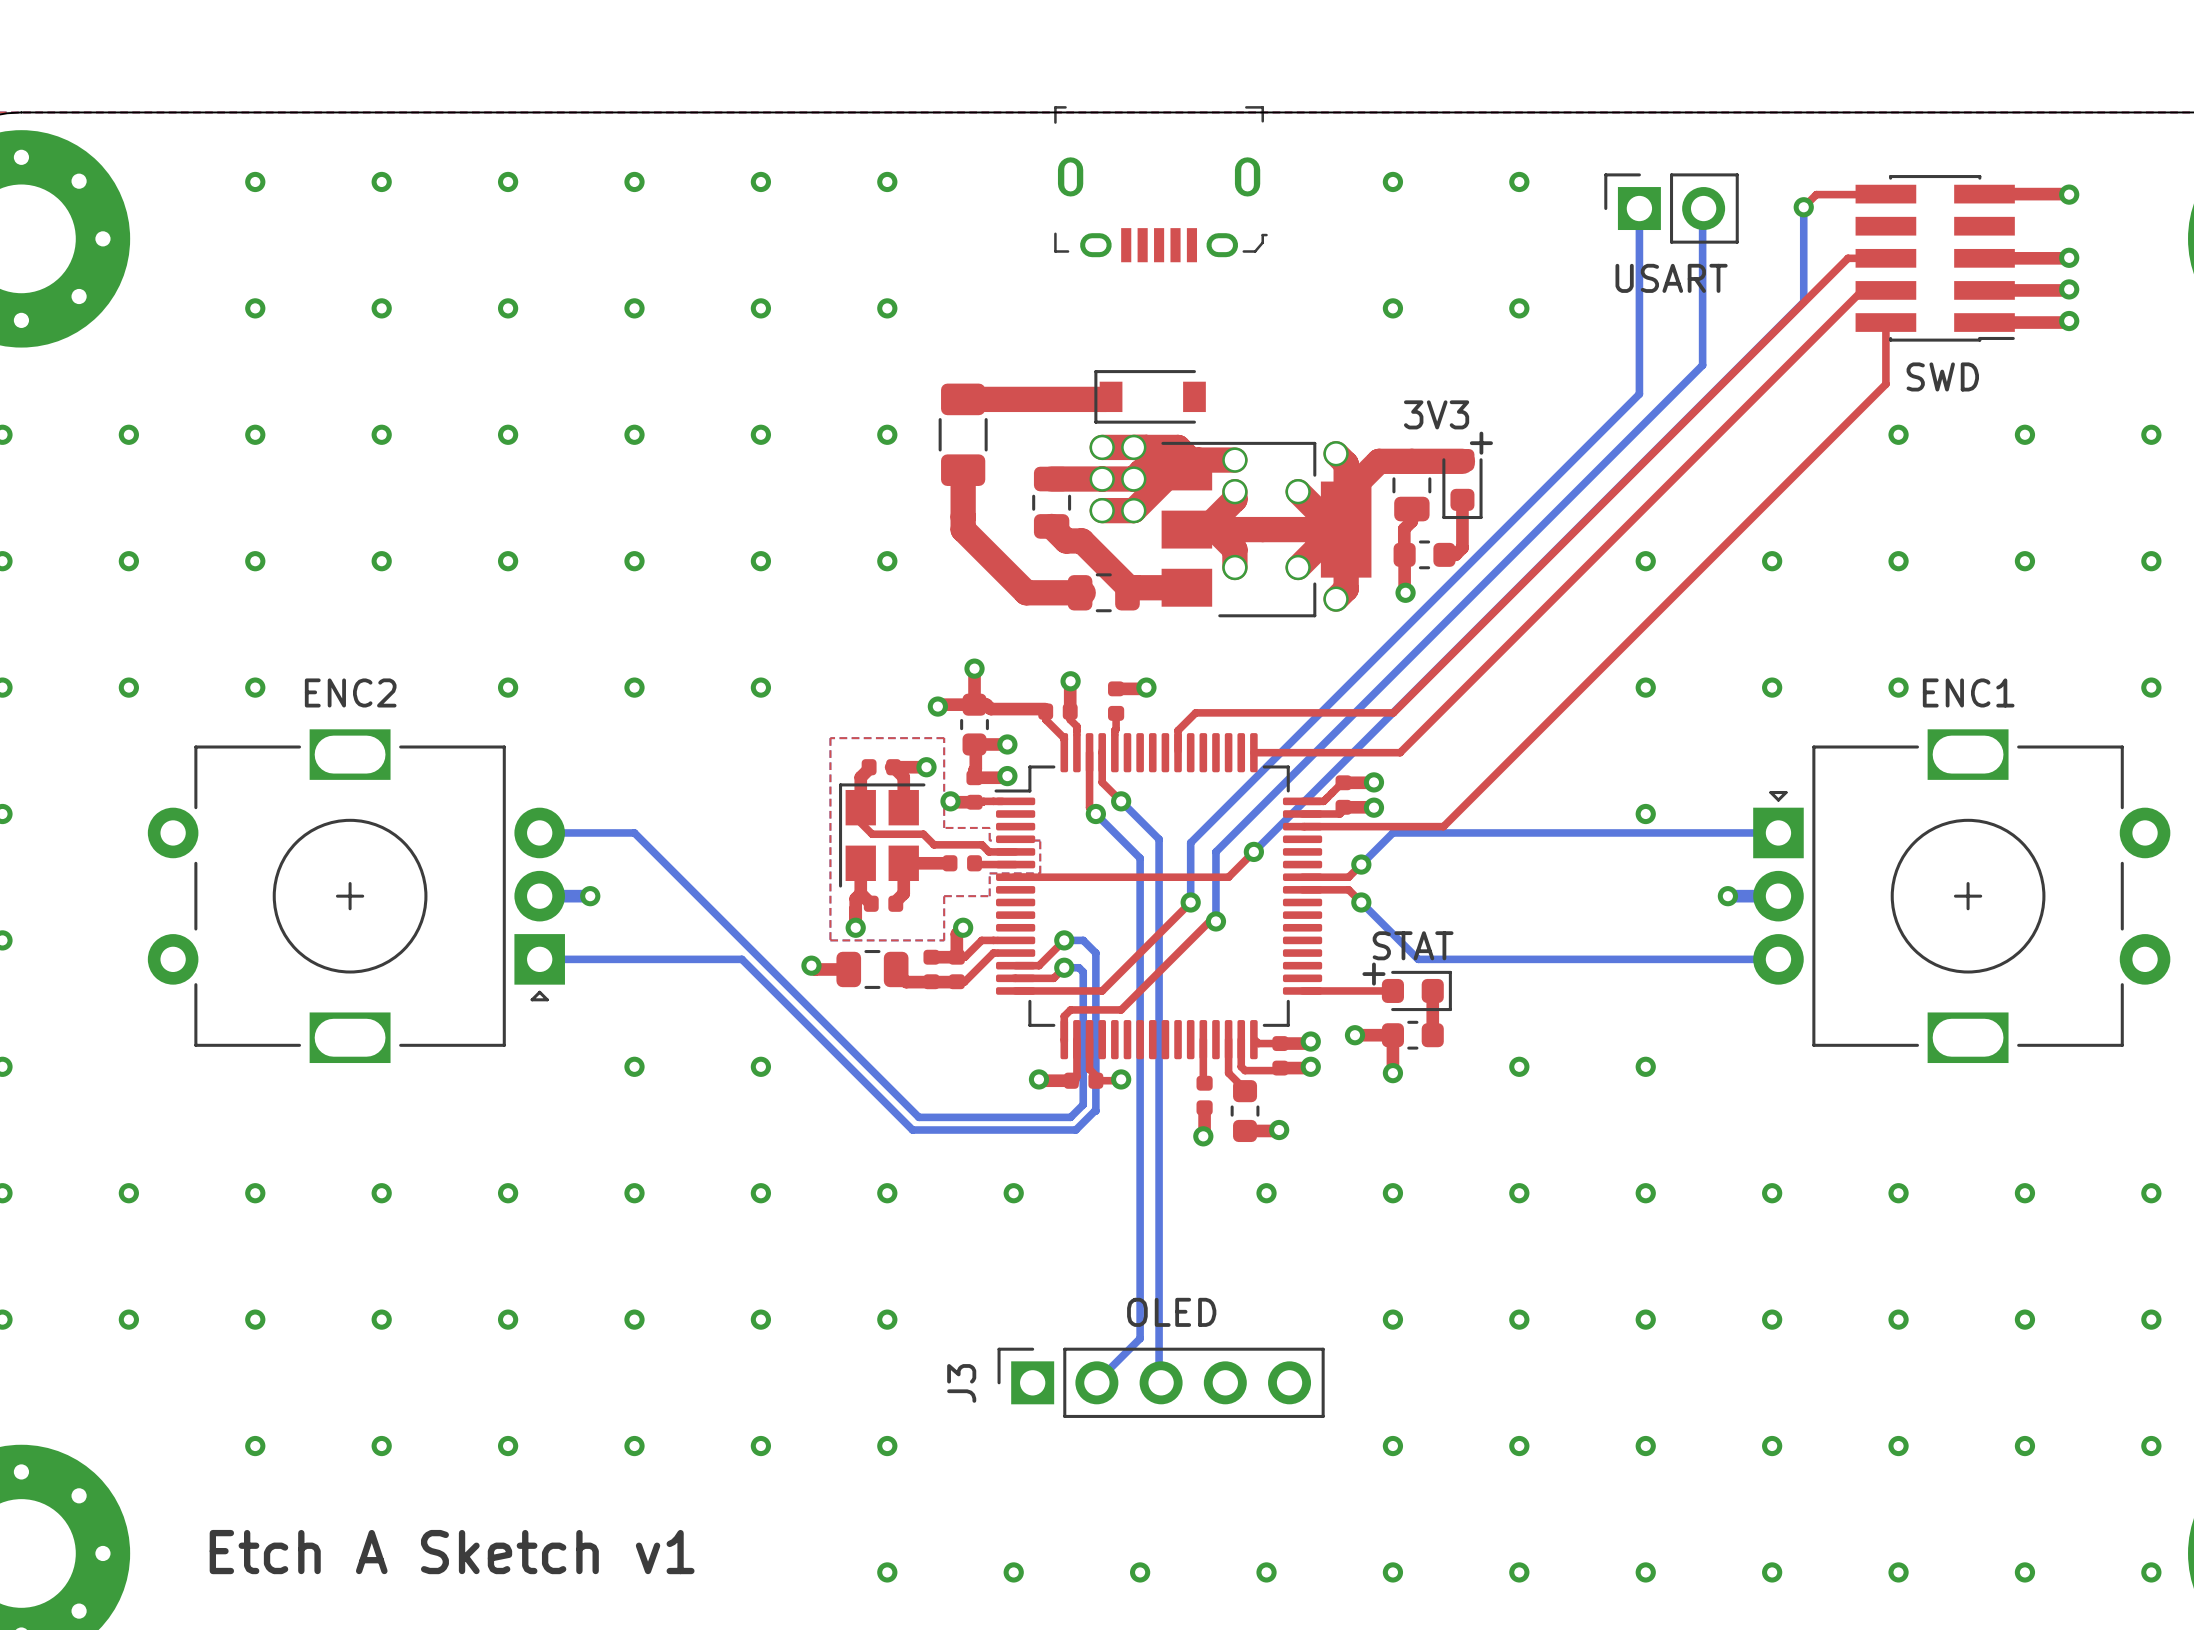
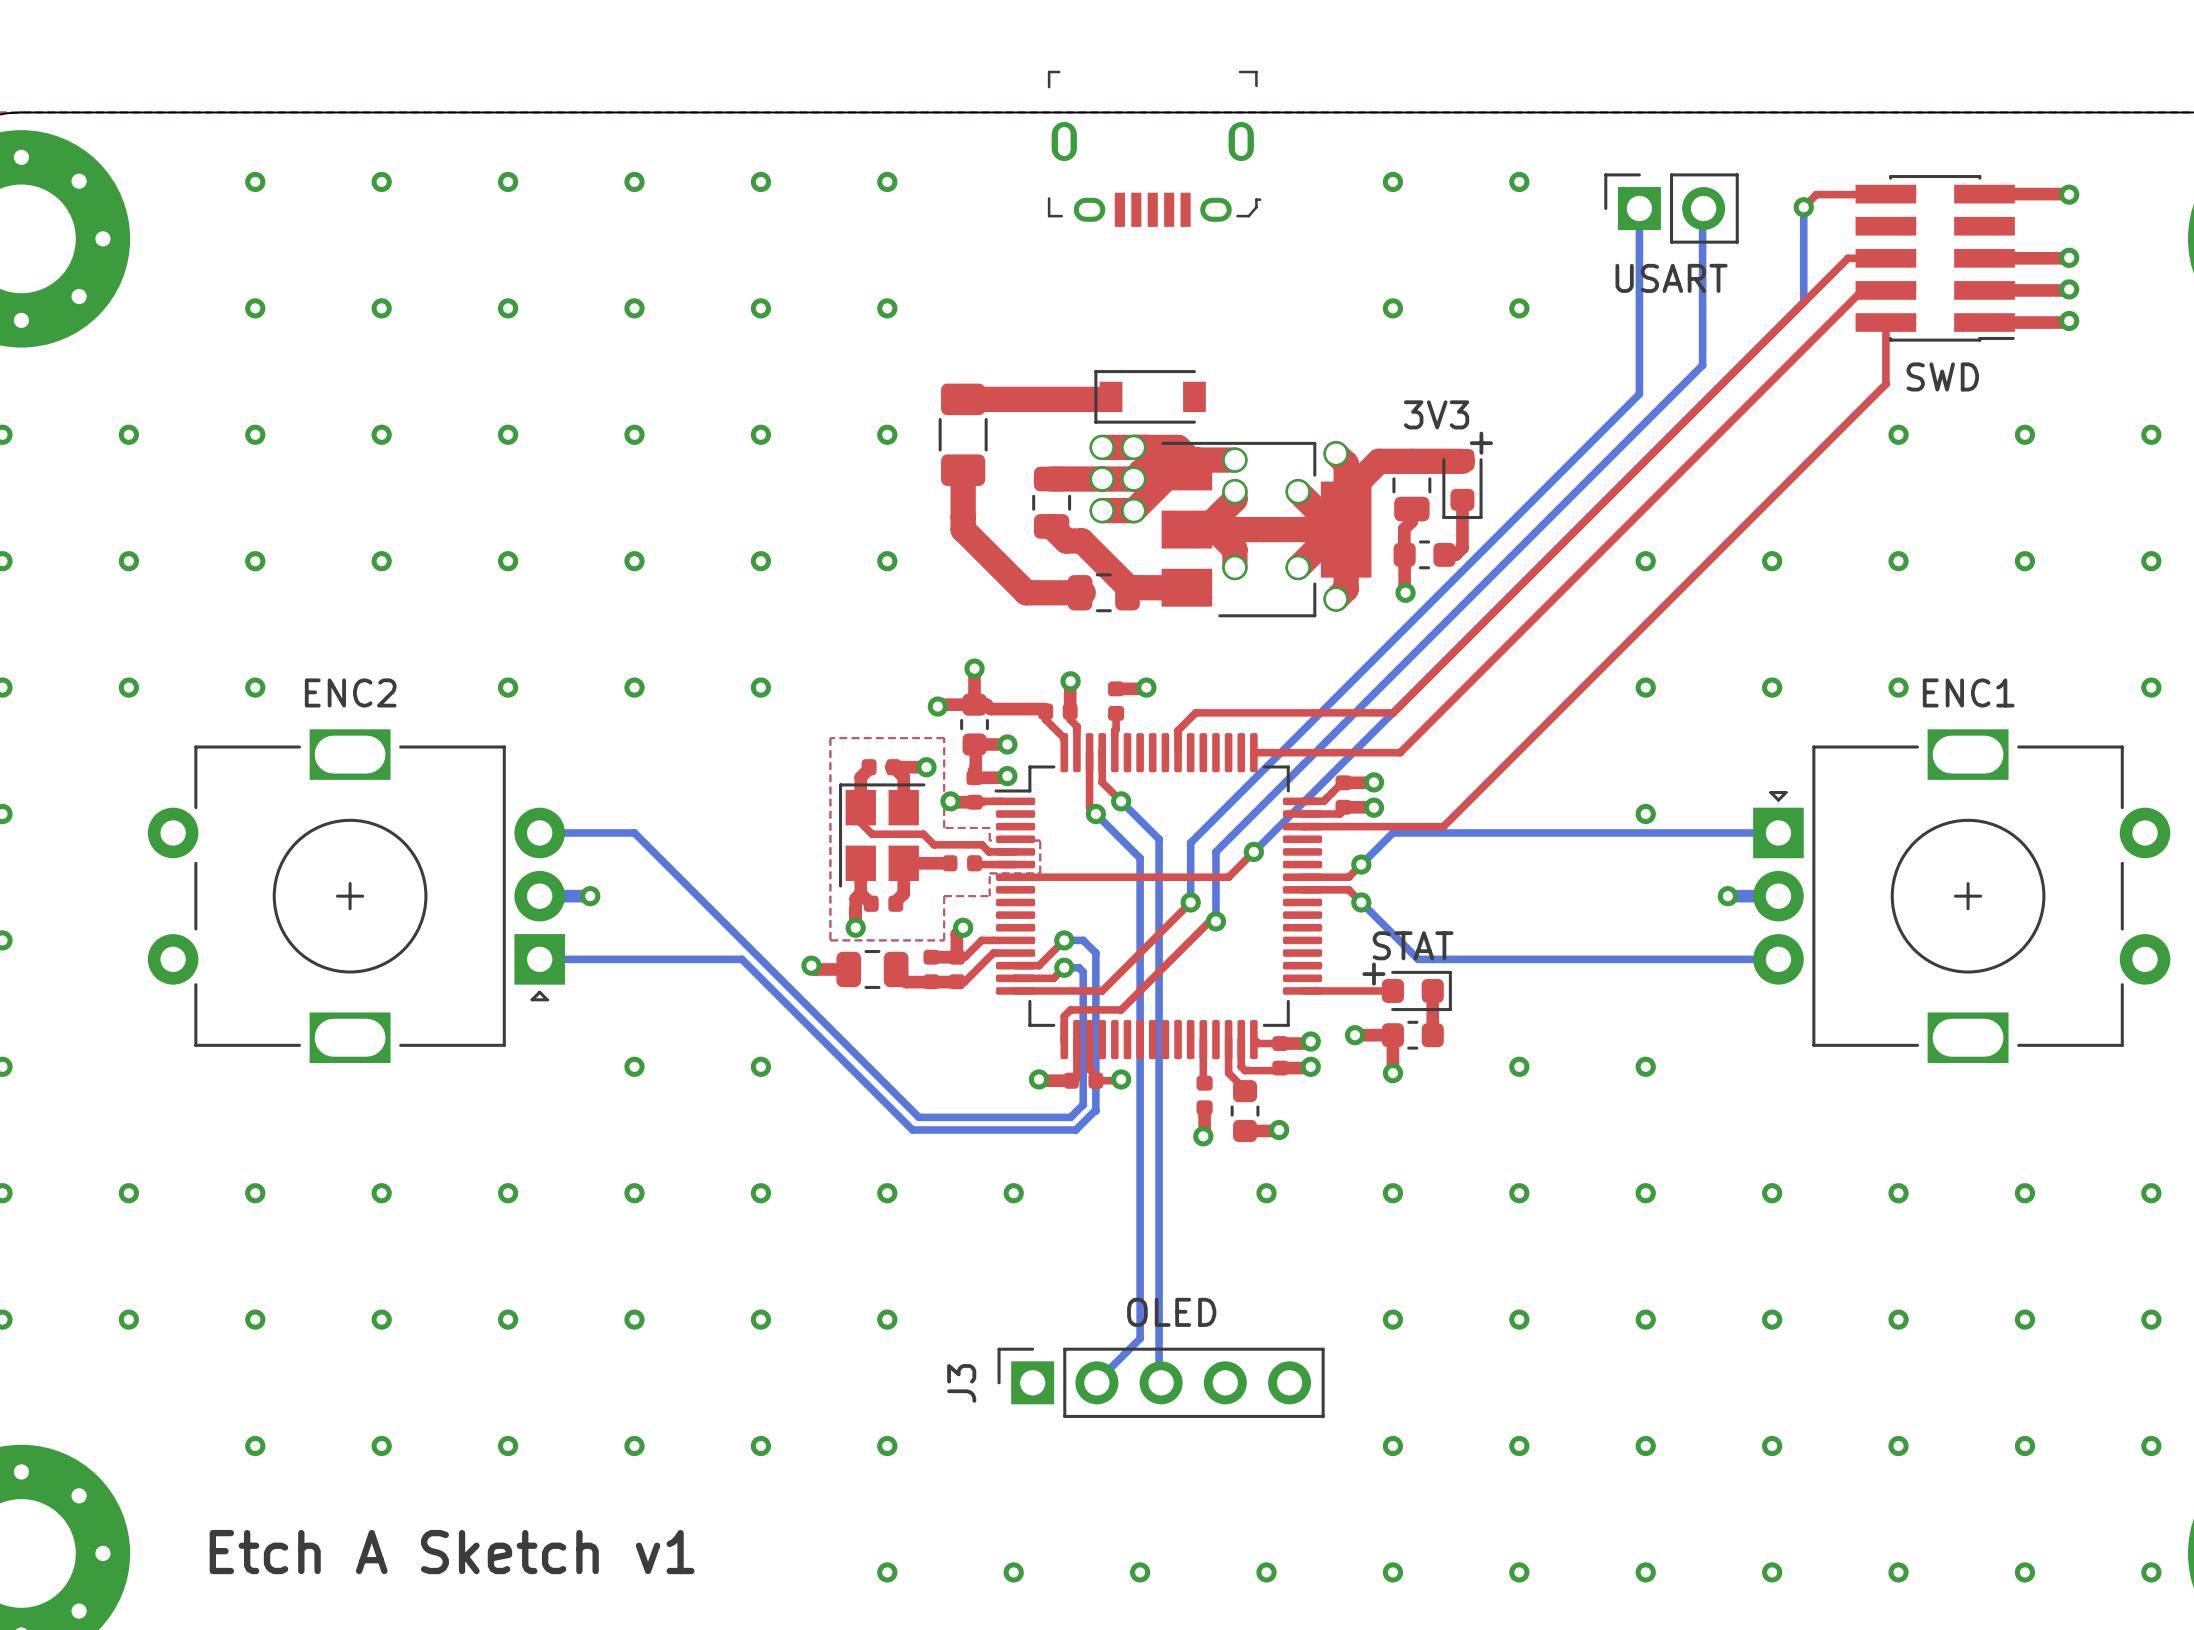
part position: (1160, 184) -> (1154, 148)

